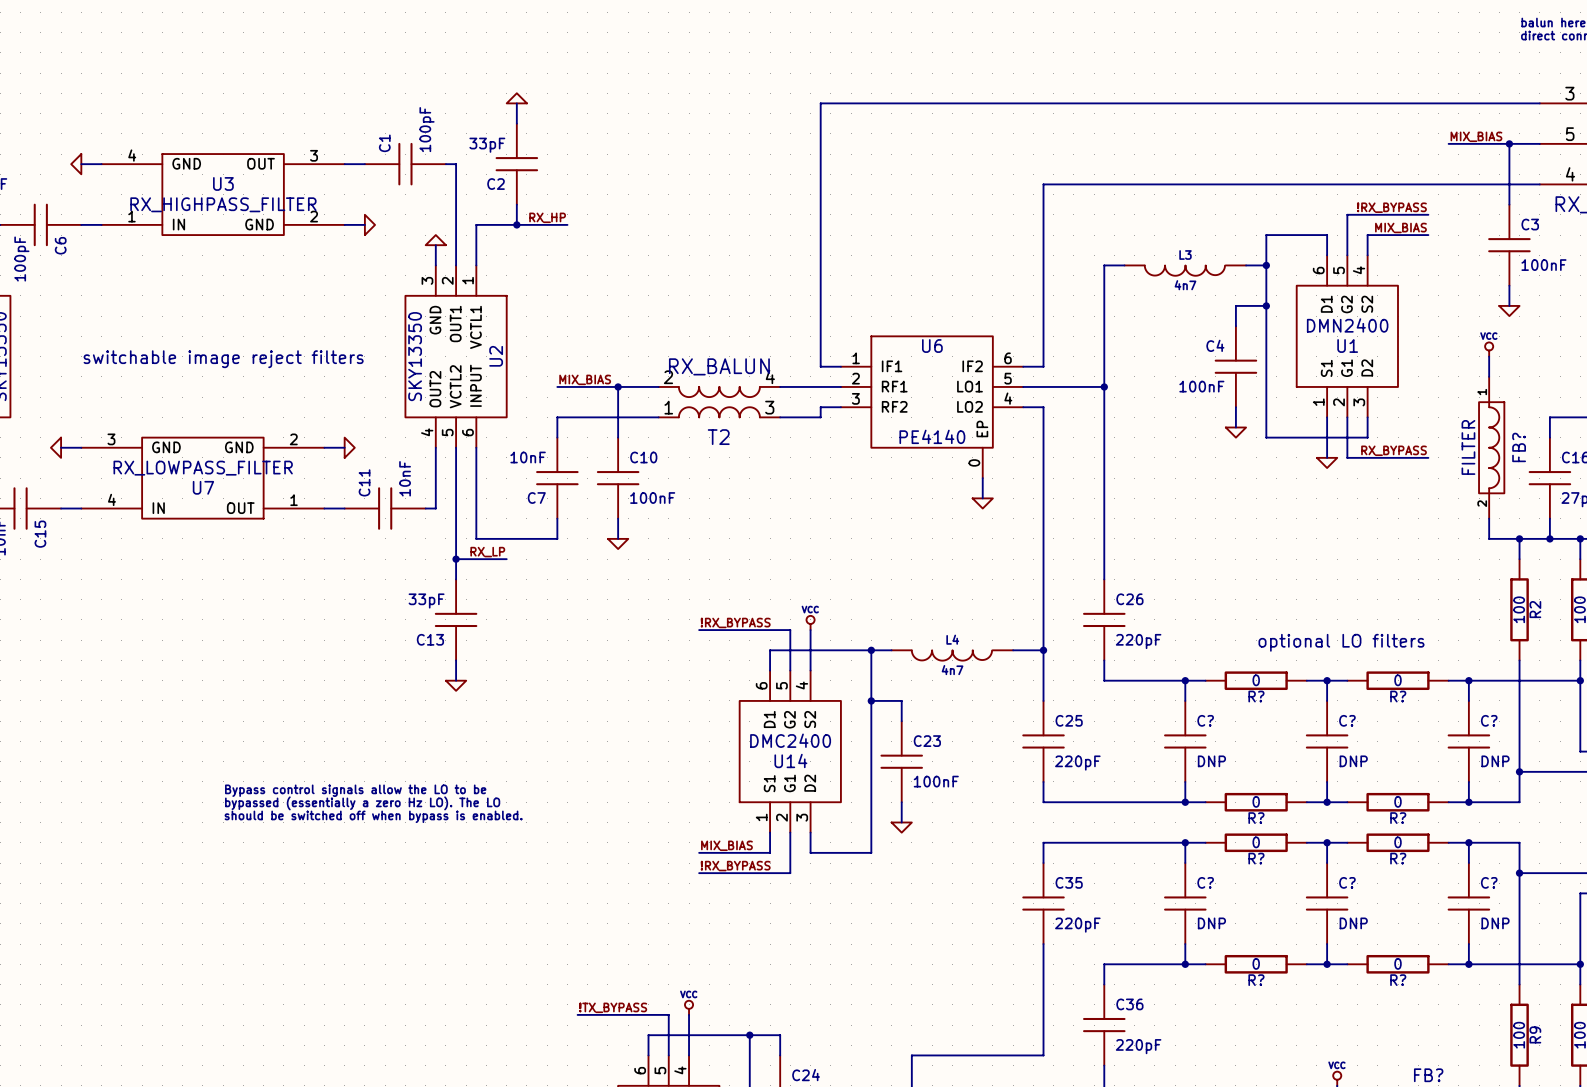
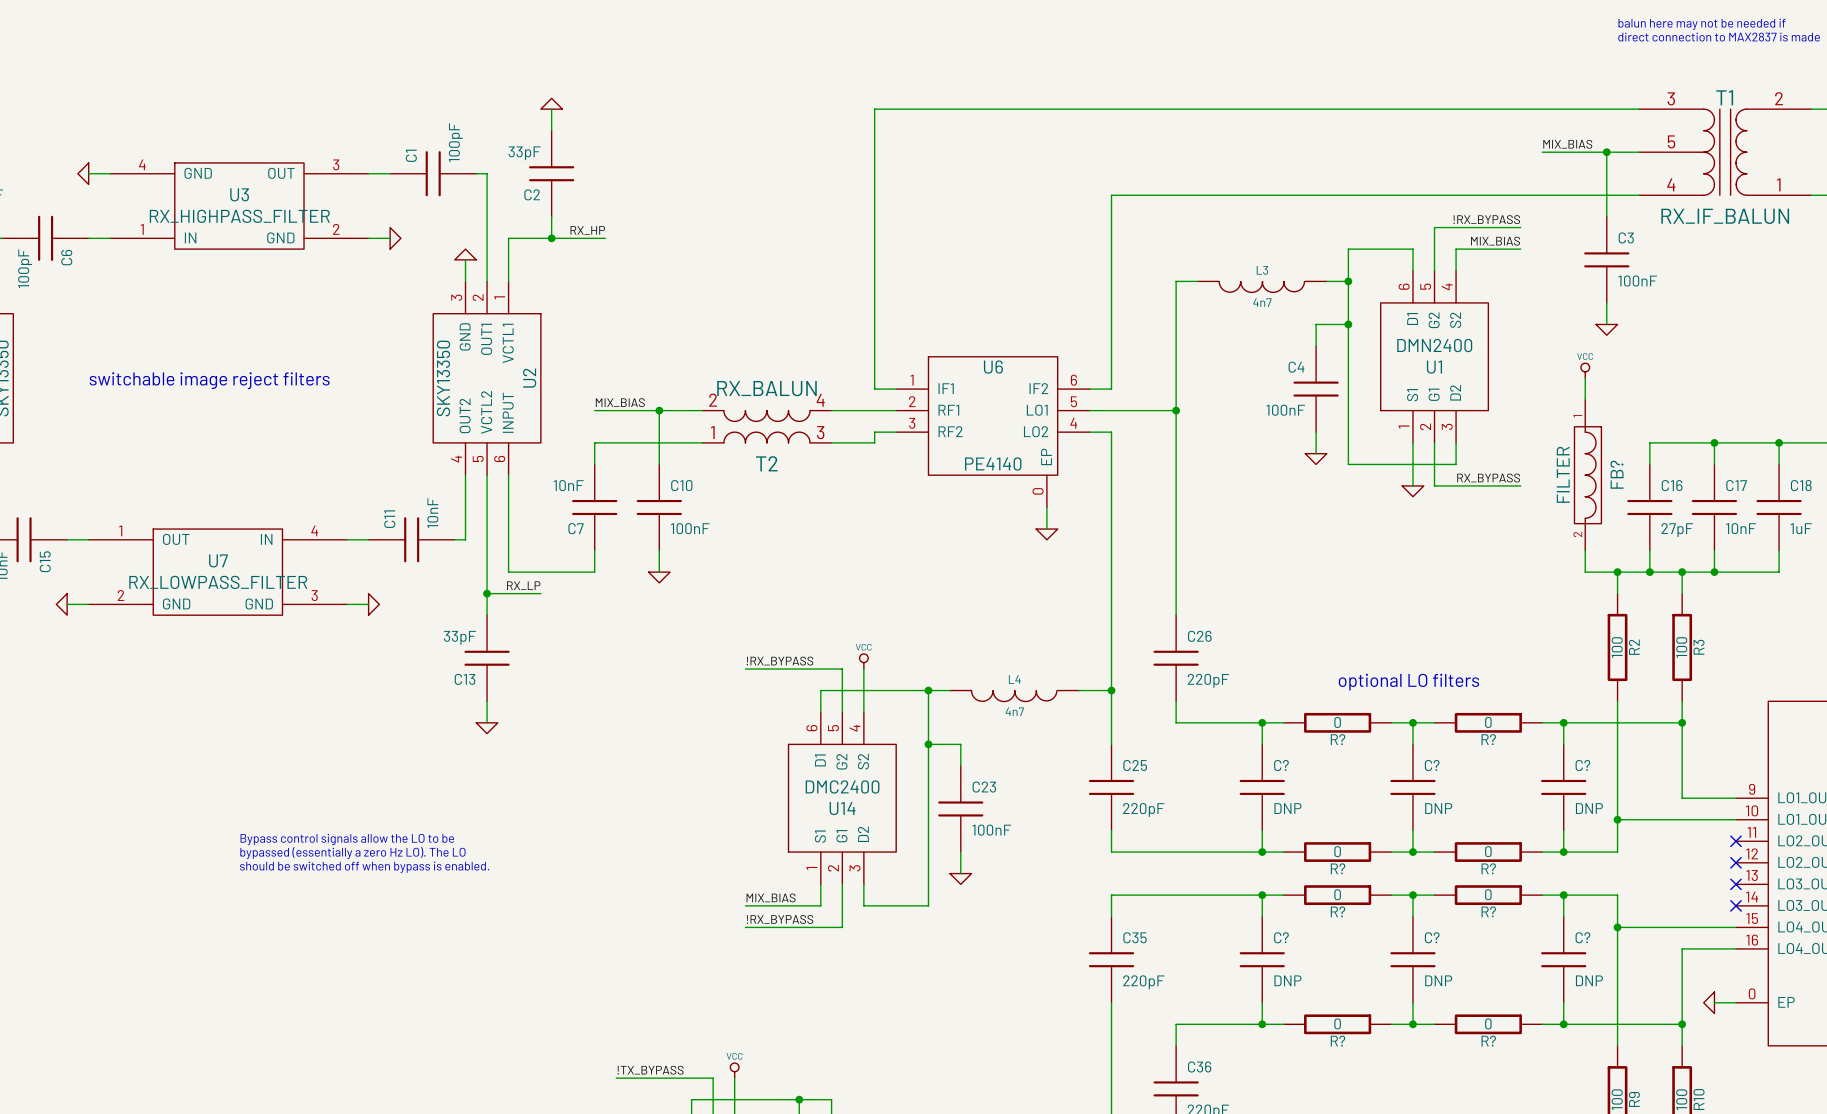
power symbol position: (56, 447) -> (61, 604)
wire: (61, 447) (81, 447) -> (67, 604) (88, 604)
wire: (324, 447) (344, 447) -> (347, 604) (368, 604)
power symbol position: (349, 447) -> (373, 604)
U7 rotation: 0° (202, 478) -> 180° (217, 572)

